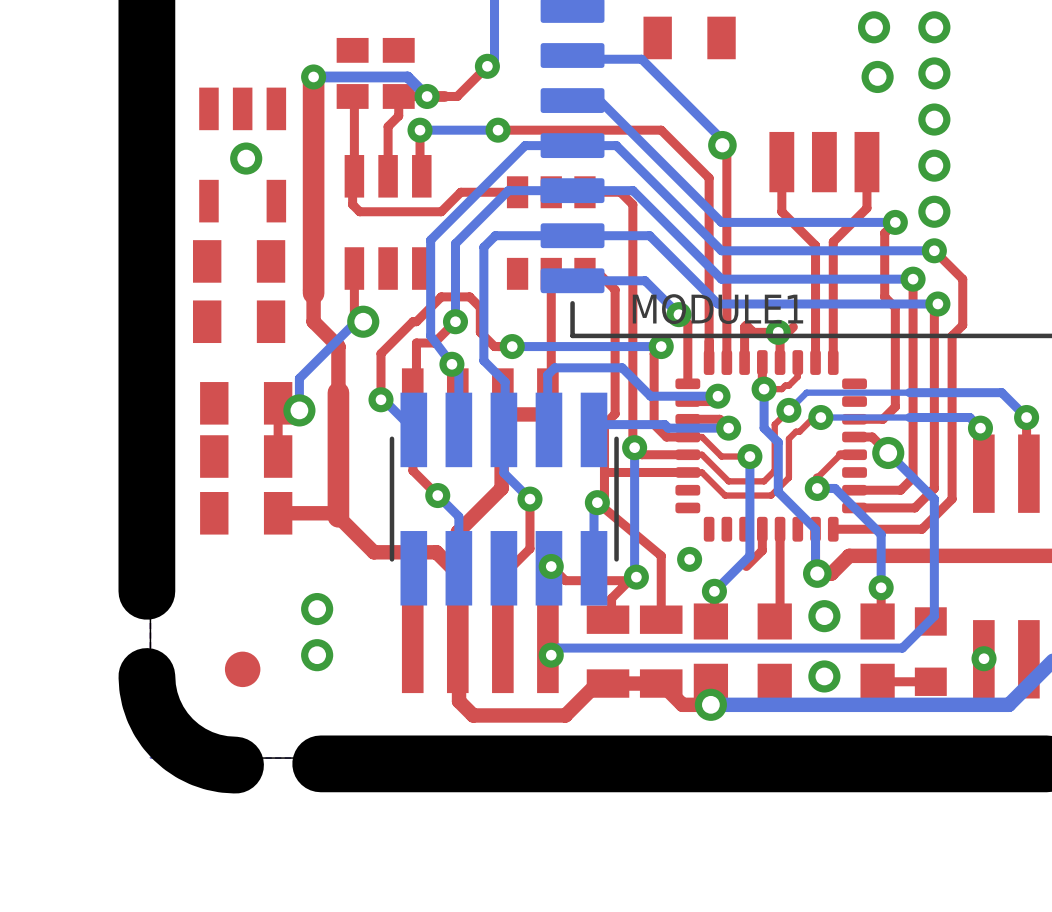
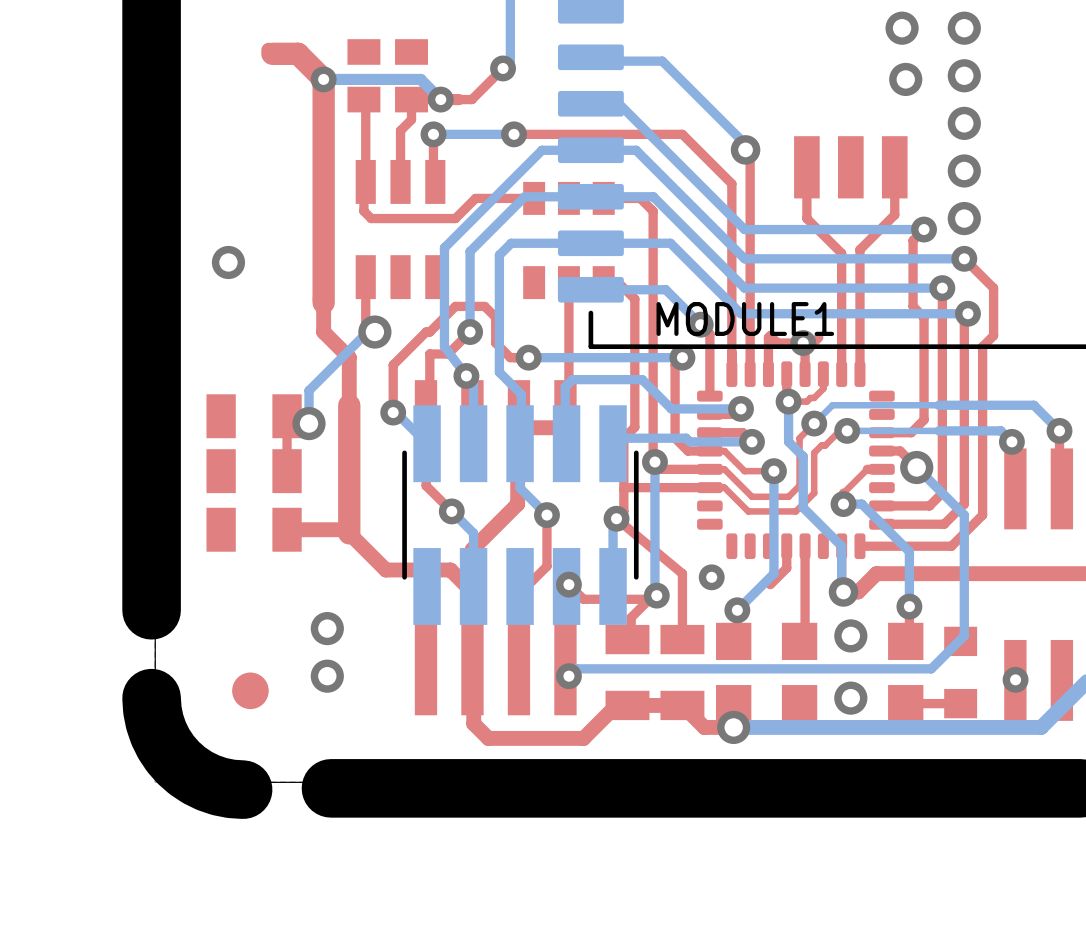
part: (689, 37) -> none
top track: none -> (268, 50) (272, 53) (298, 53) (323, 79)
part: (242, 155) -> none
via position: (246, 158) -> (228, 262)
part: (239, 261) -> none
part: (239, 321) -> none

